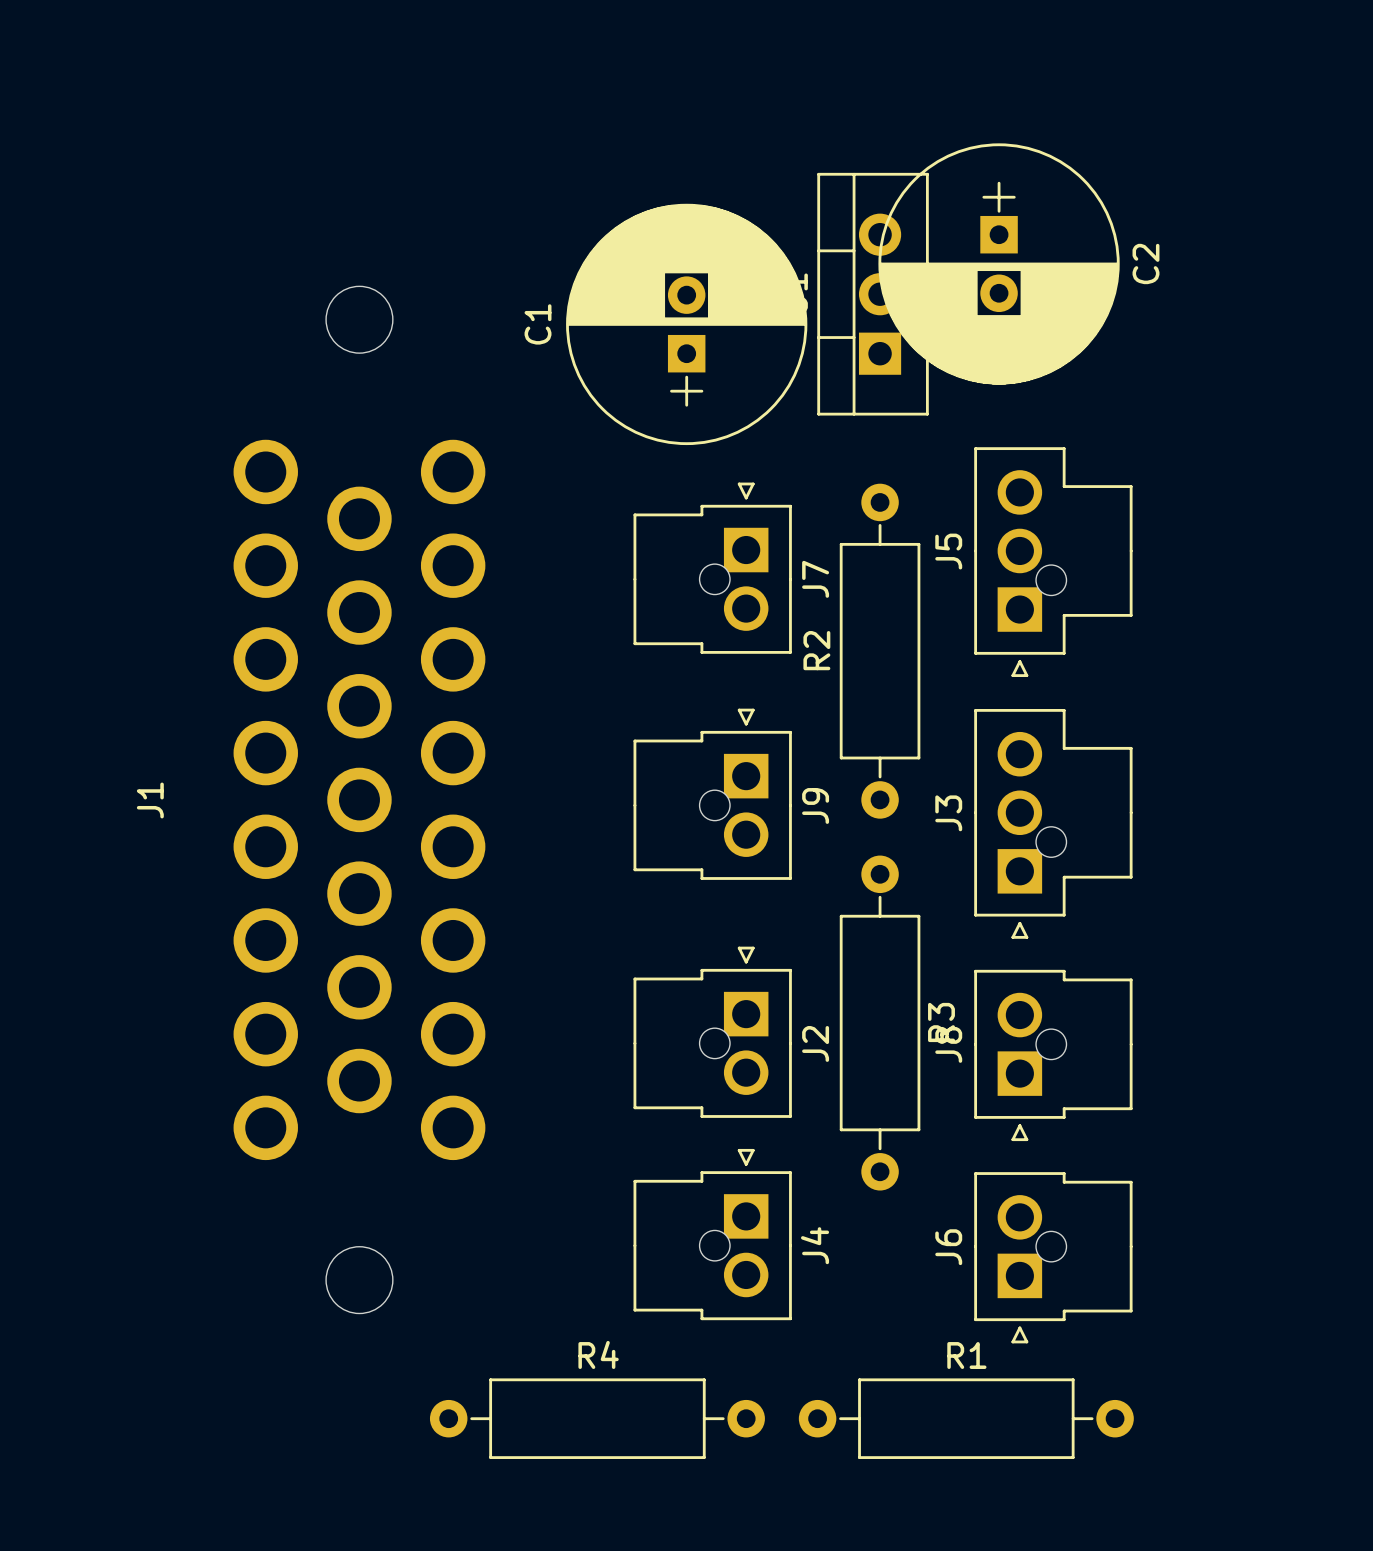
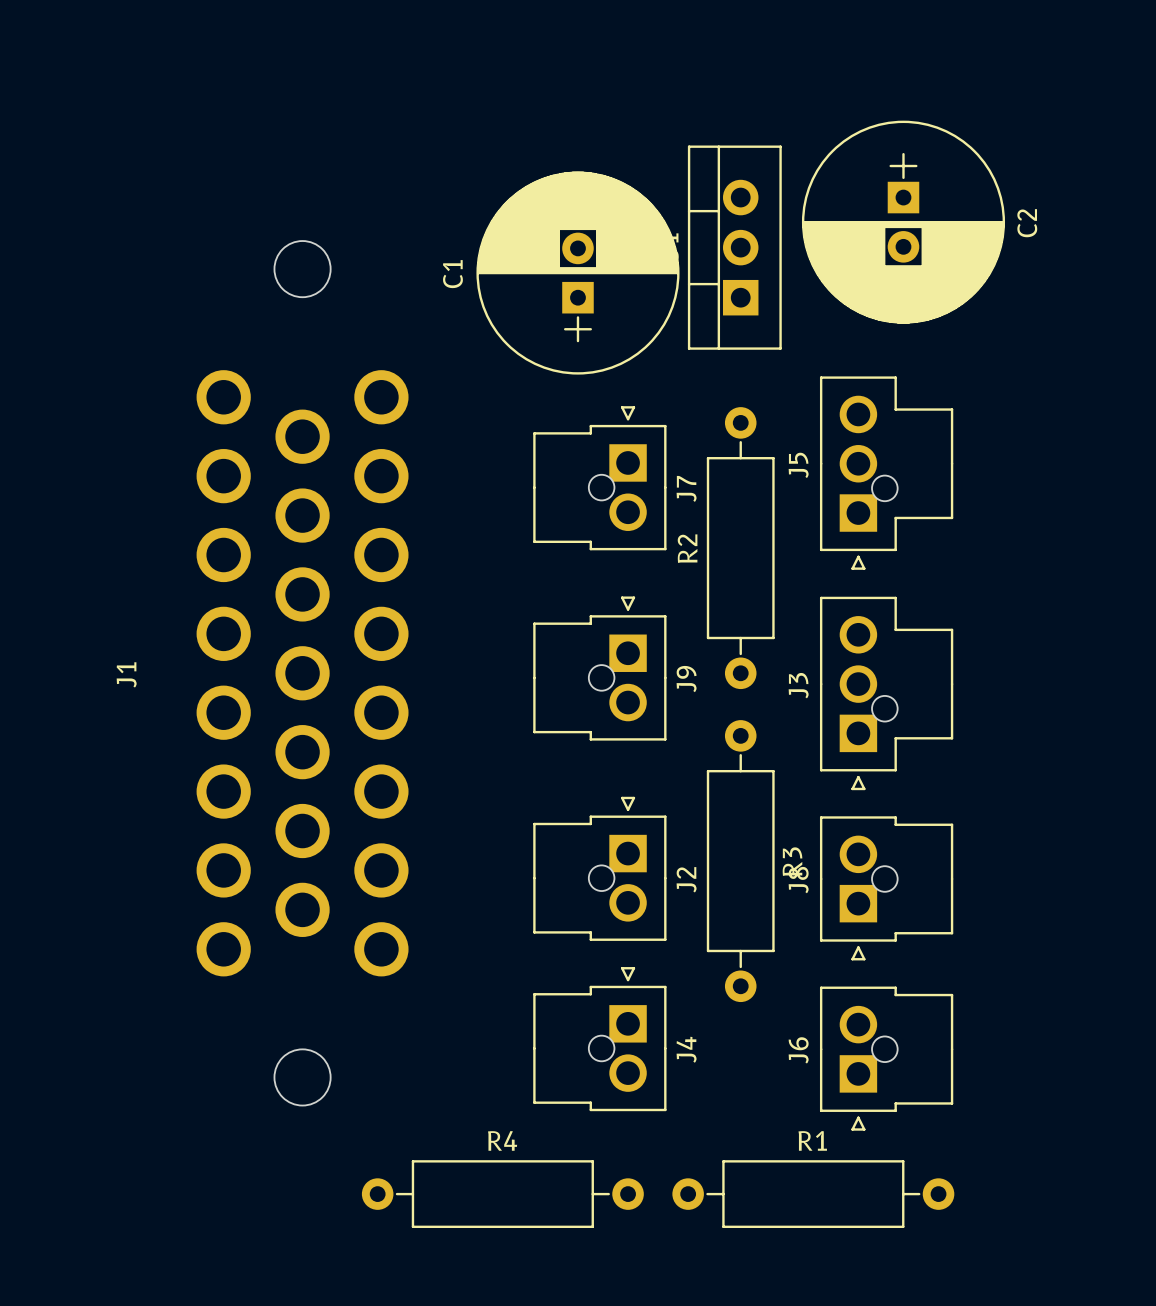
C2 position: (999, 263) -> (903, 222)

